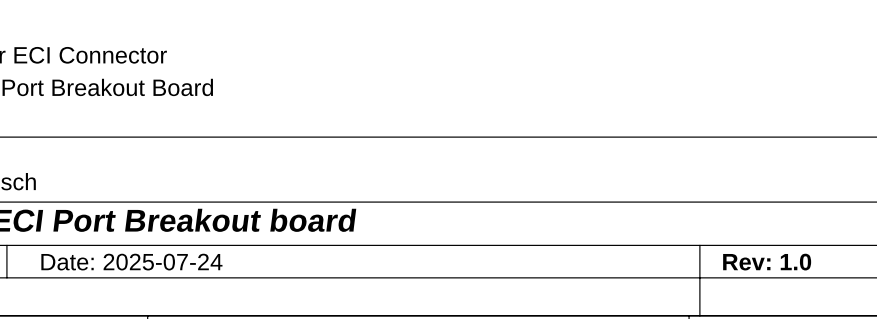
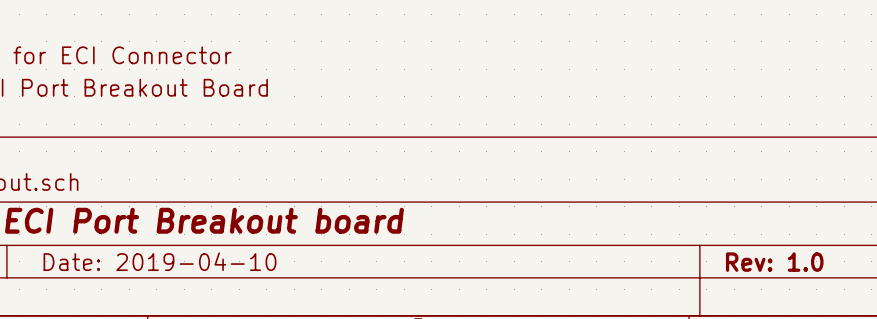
title block: Date: 2025-07-24 (131, 262) -> Date: 2019-04-10 (160, 261)

